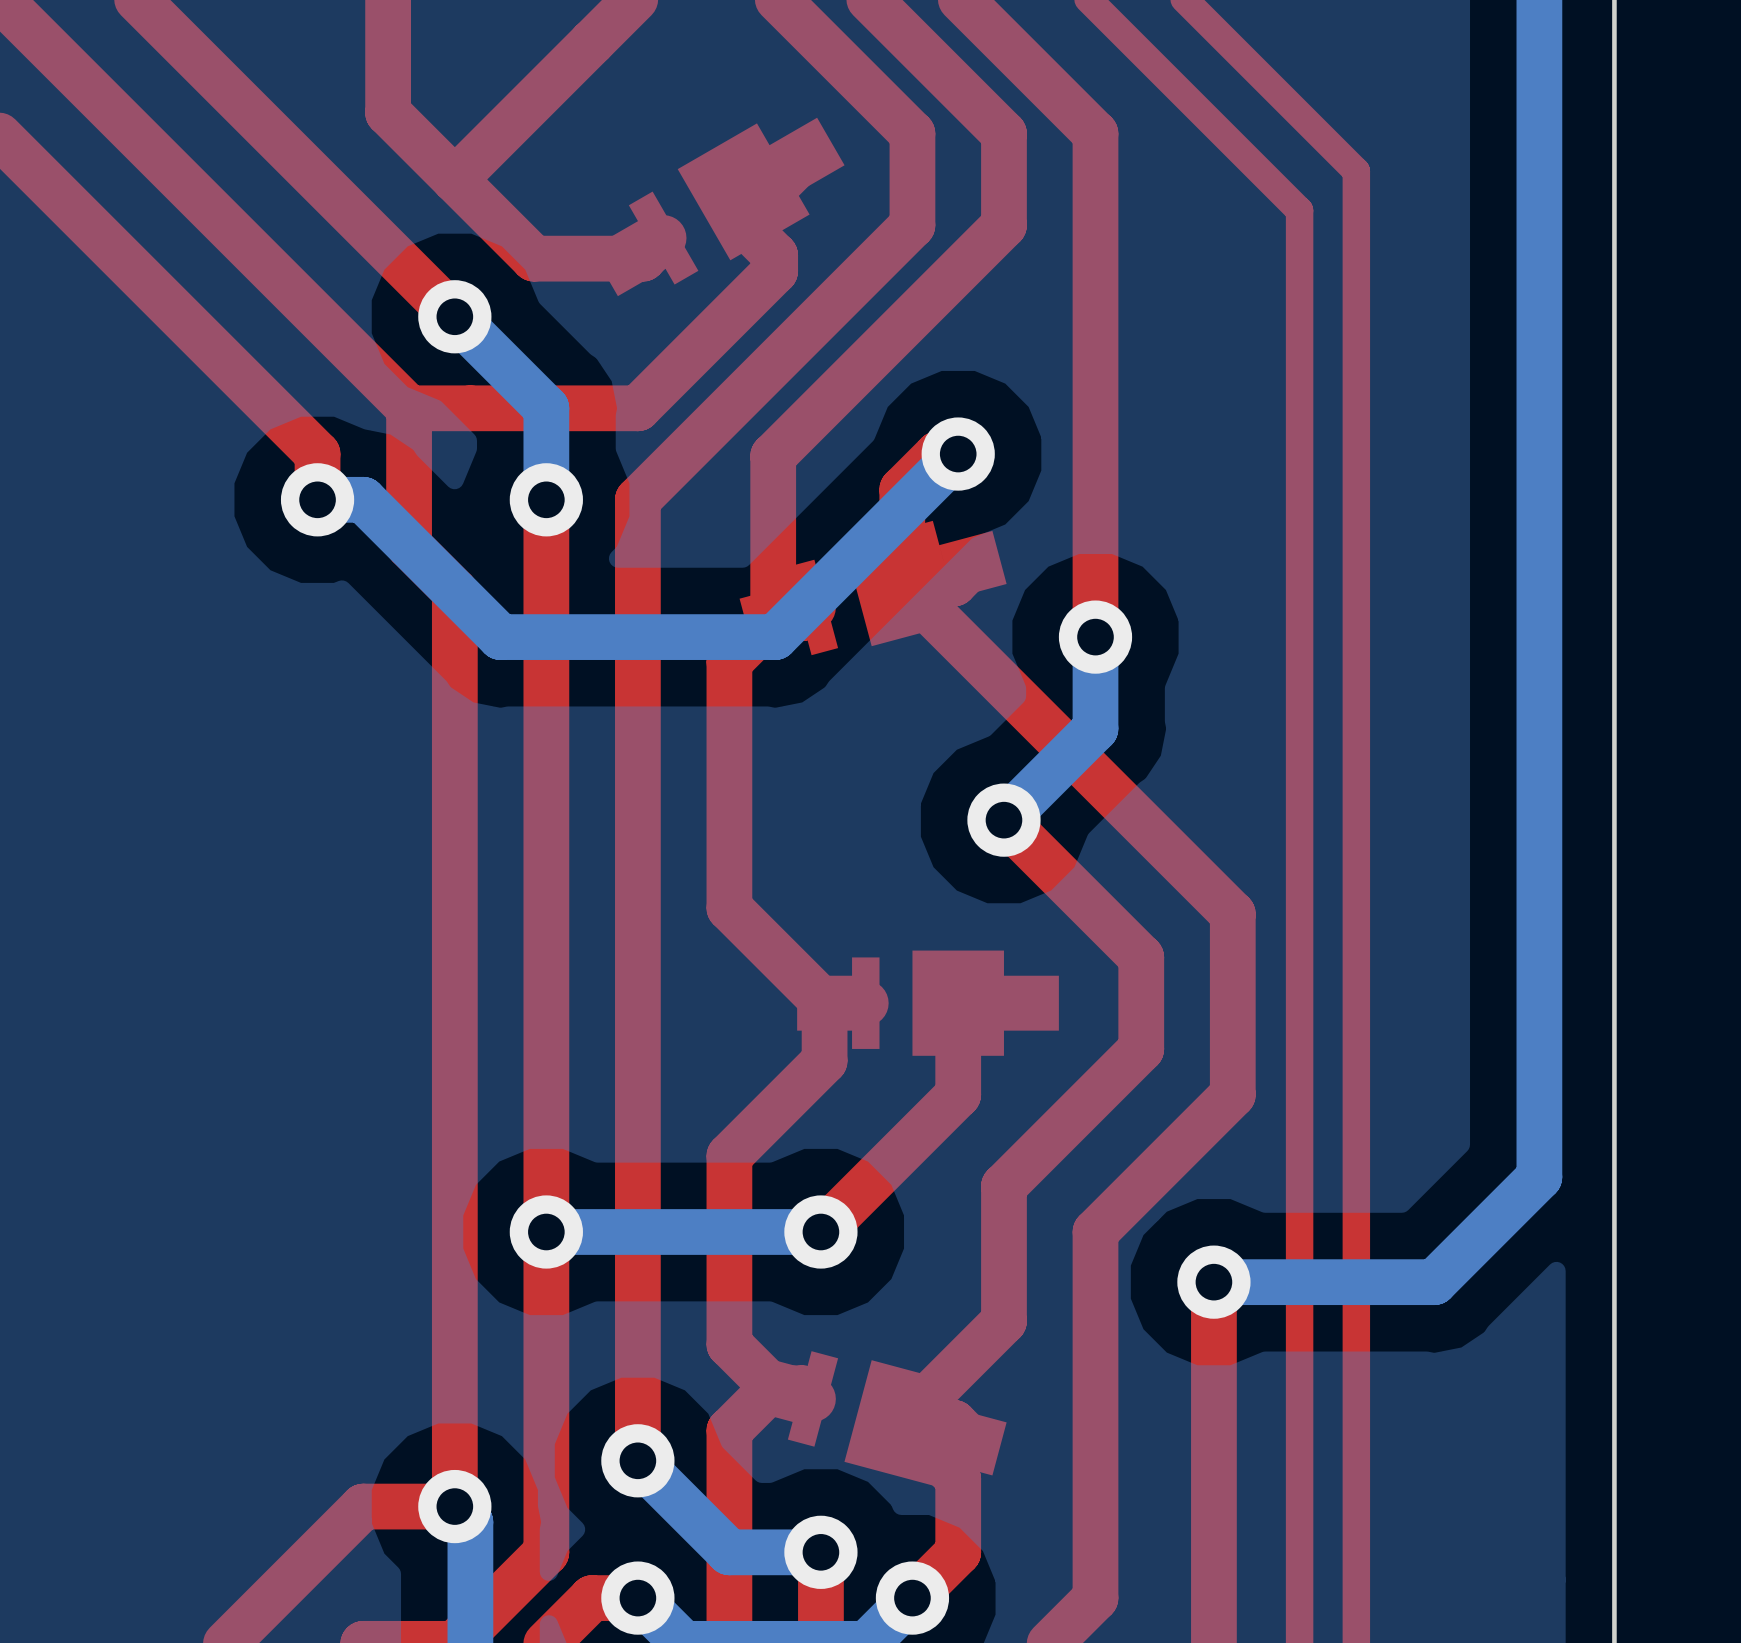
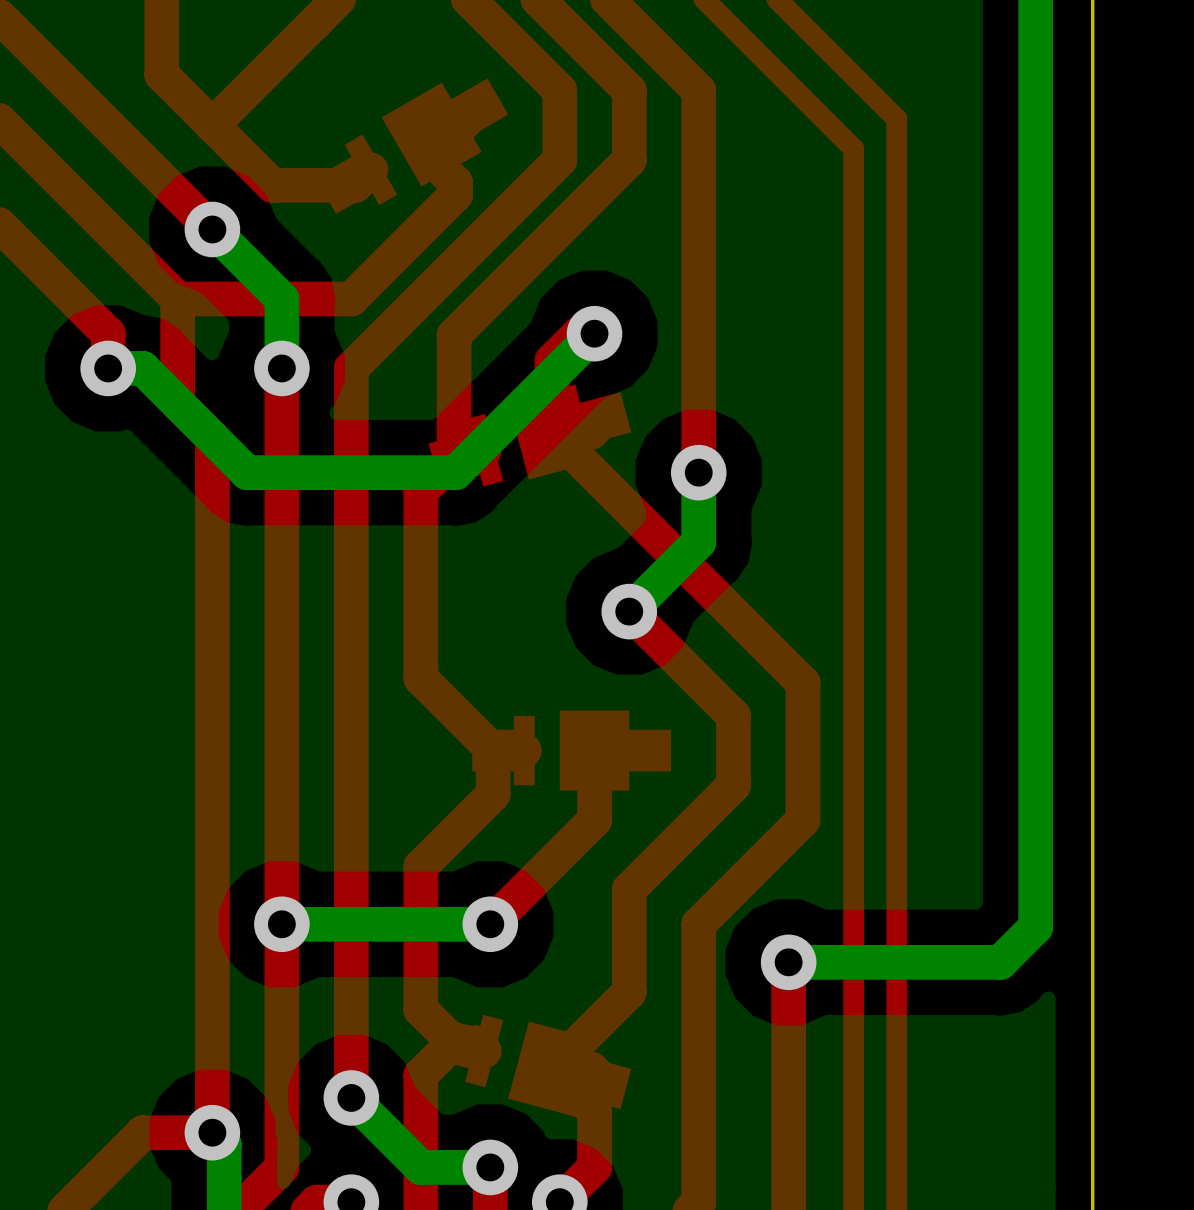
bottom track: (1539, 1177) (1434, 1282) -> (1035, 882) (1035, 927) (1000, 962) (955, 962)

